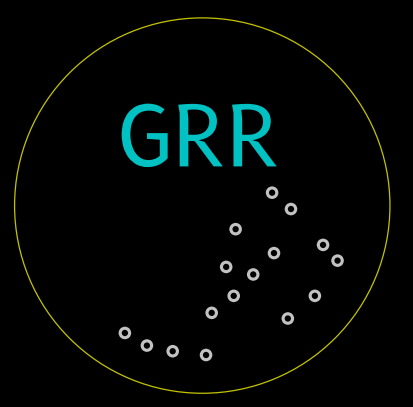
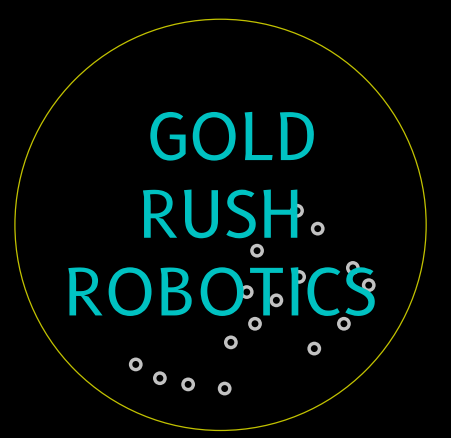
text: none -> GOLD (232, 136)
text: GRR (199, 135) -> none
text: none -> RUSH (220, 213)
text: none -> ROBOTICS (221, 291)

